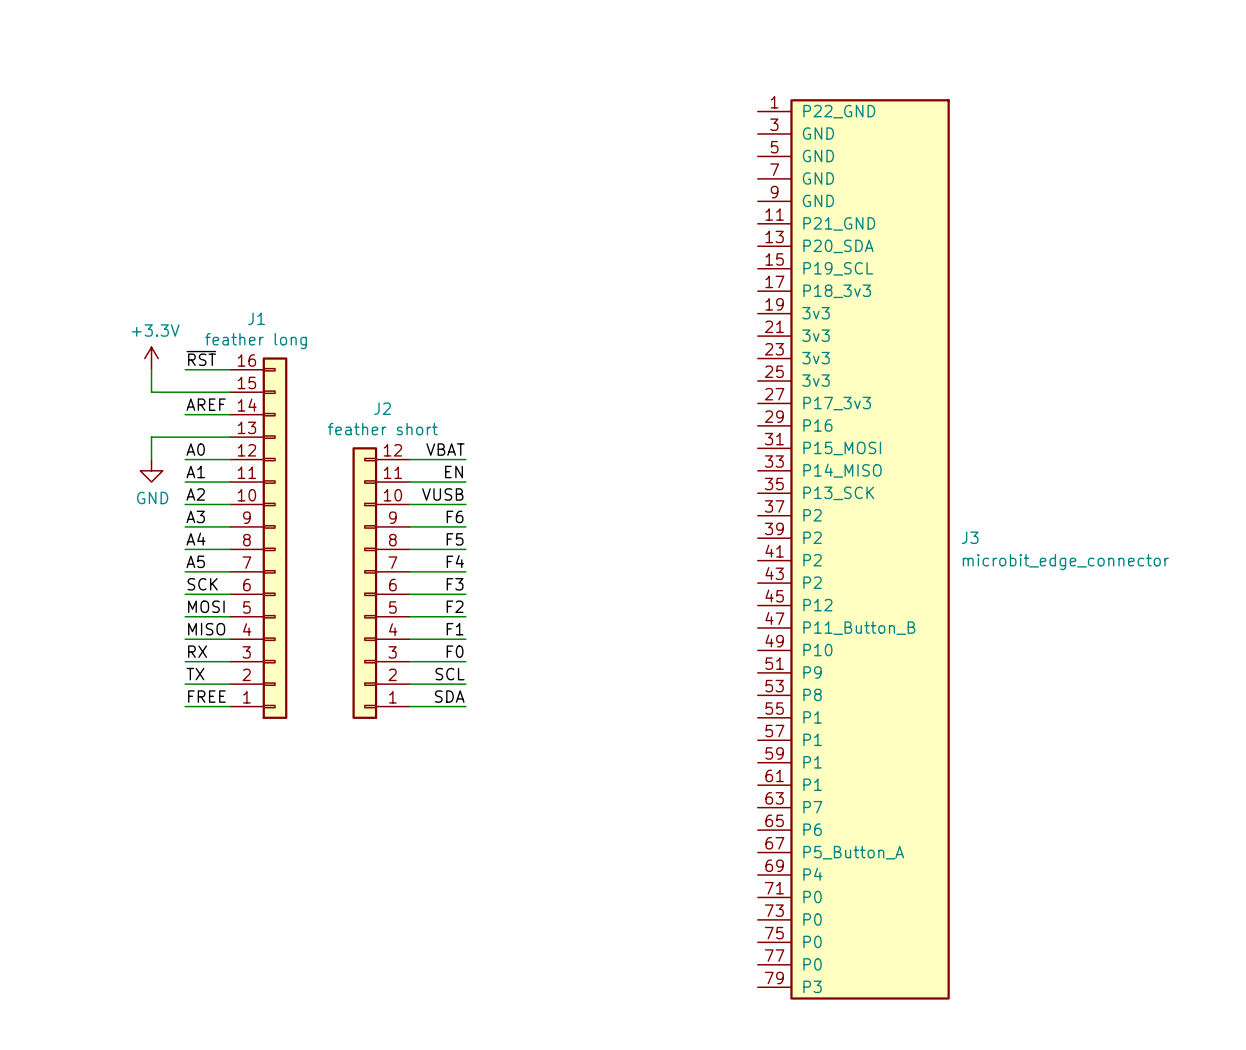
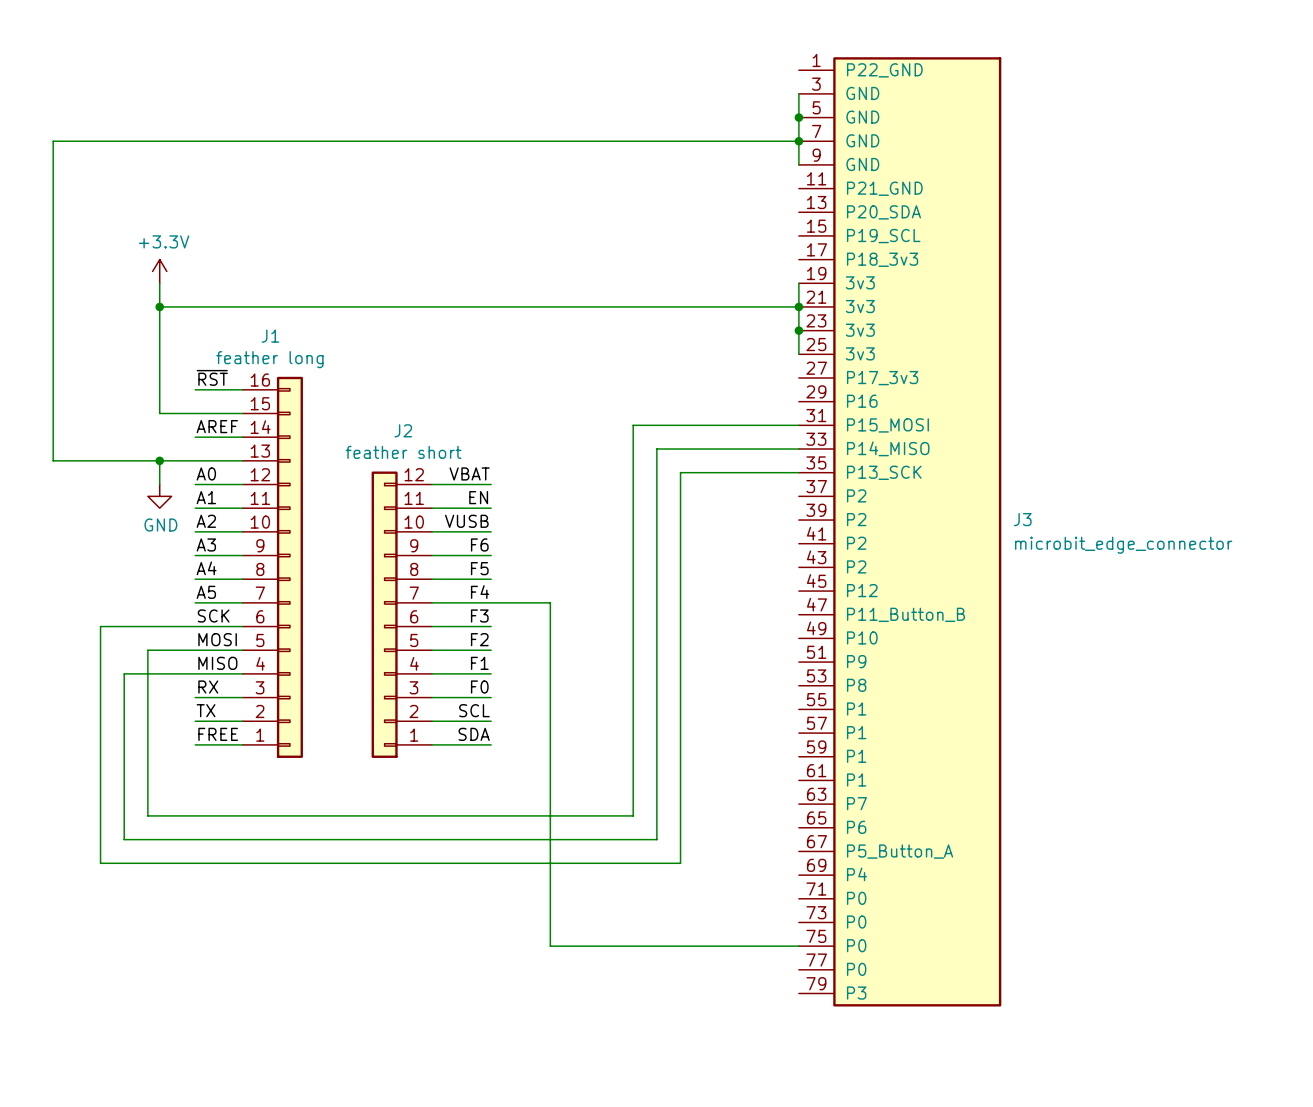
wire: none -> (798, 93) (798, 164)
junction: none -> (798, 117)
wire: none -> (798, 141) (53, 141) (53, 460) (159, 460)
junction: none -> (798, 141)
wire: none -> (159, 283) (159, 389)
wire: none -> (798, 283) (798, 354)
wire: none -> (159, 306) (798, 306)
junction: none -> (159, 306)
junction: none -> (798, 306)
junction: none -> (798, 330)
power symbol position: +3.3V (151, 358) -> +3.3V (159, 271)
wire: none -> (798, 425) (633, 425) (633, 815) (147, 815) (147, 650) (195, 650)
wire: none -> (798, 449) (656, 449) (656, 839) (124, 839) (124, 673) (195, 673)
junction: none -> (159, 460)
wire: none -> (798, 472) (680, 472) (680, 863) (100, 863) (100, 626) (195, 626)
J3 position: (853, 549) -> (900, 531)
wire: none -> (491, 602) (550, 602) (550, 946) (798, 946)

